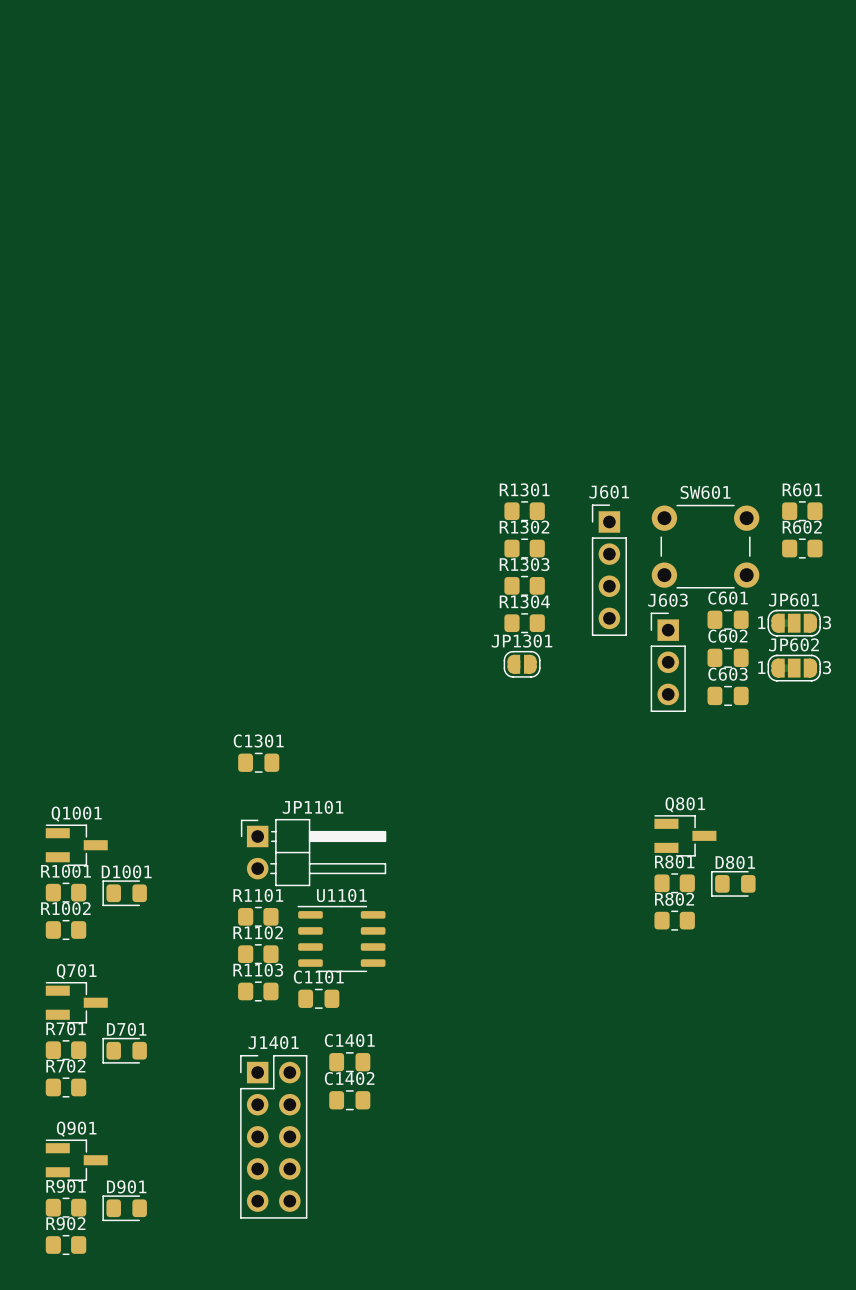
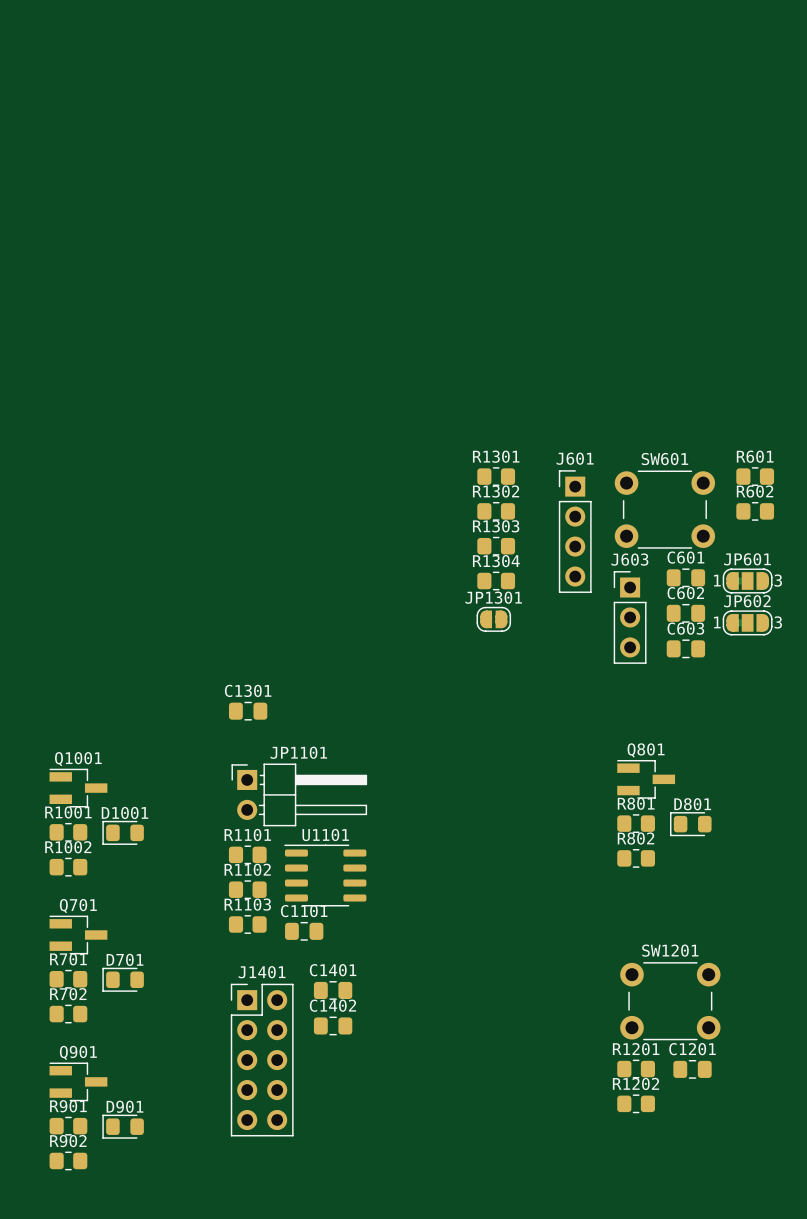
SW1201: none -> (670, 1001)
R1201: none -> (636, 1069)
C1201: none -> (692, 1069)
R1202: none -> (636, 1103)

